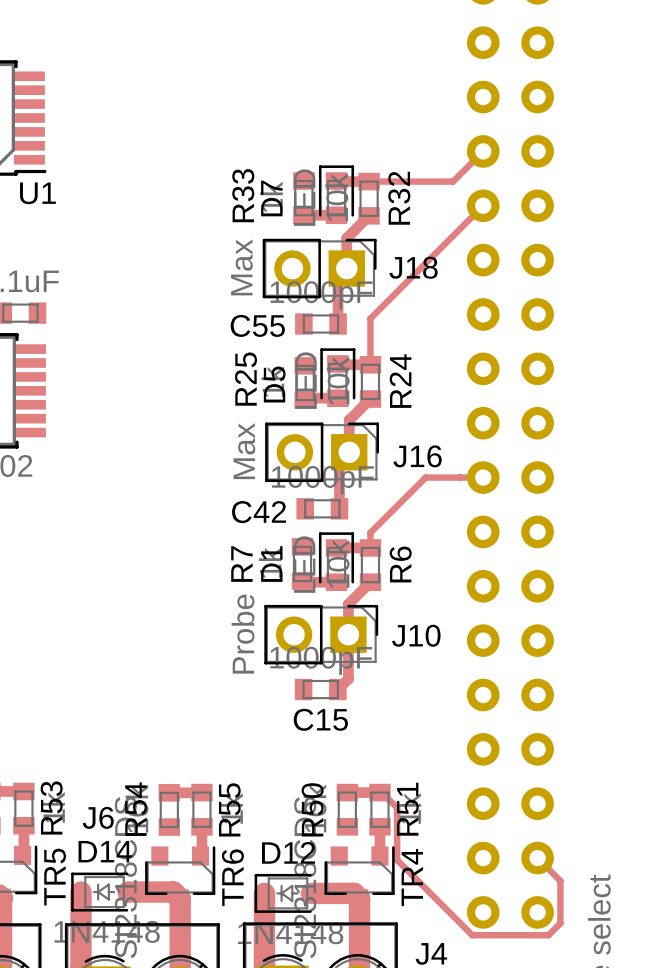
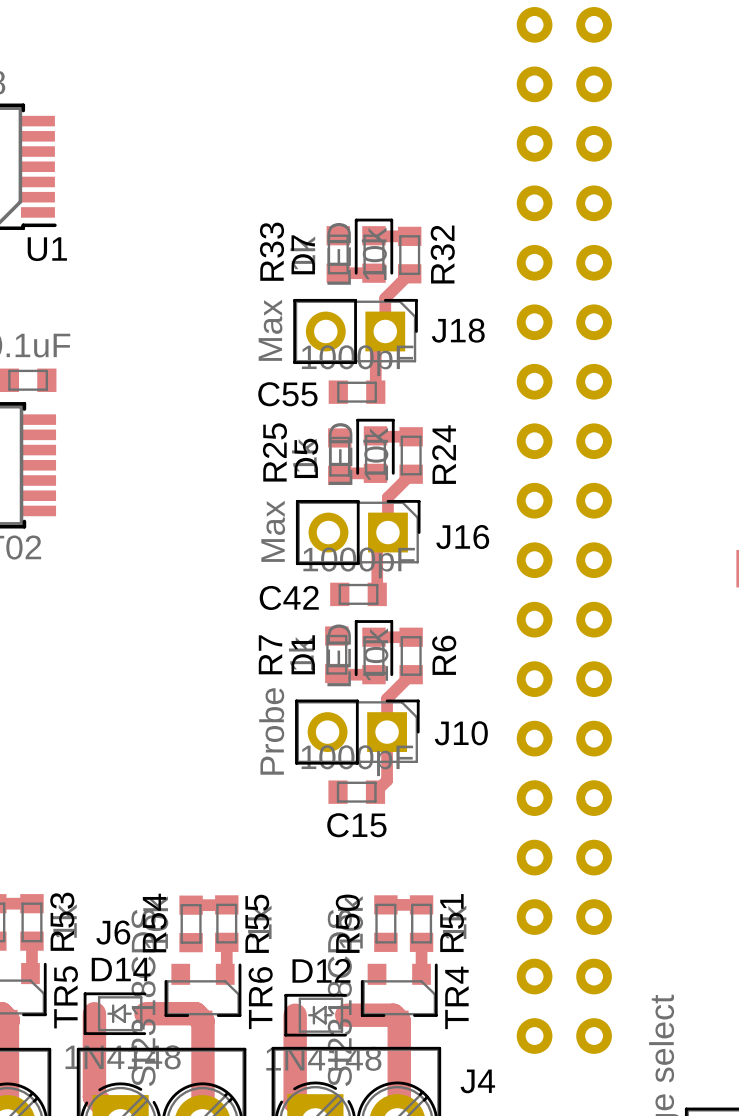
track: (483, 151) (453, 181) (369, 181) -> none
track: (483, 205) (370, 318) (370, 364) -> none
track: (483, 477) (425, 477) (370, 532) (370, 547) -> none
track: (379, 792) (397, 807) (397, 860) (472, 935) (548, 935) (560, 923) (560, 880) (537, 858) -> none

